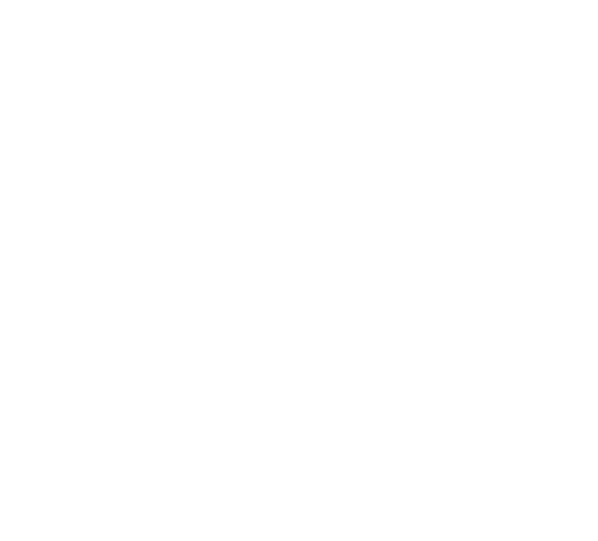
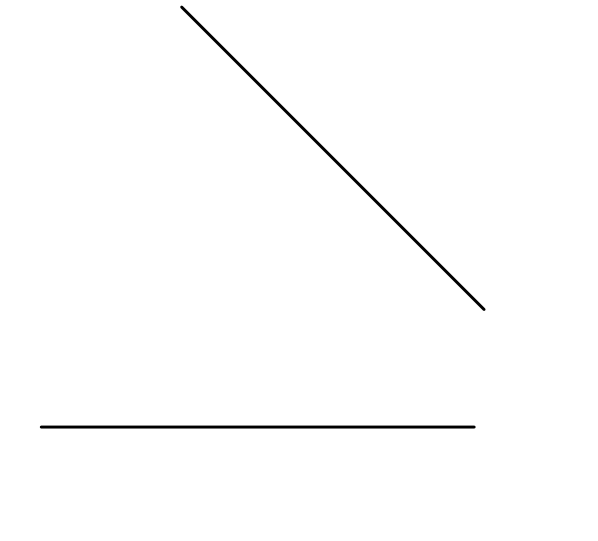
line: none -> (181, 7) (484, 309)
line: none -> (41, 427) (474, 427)

